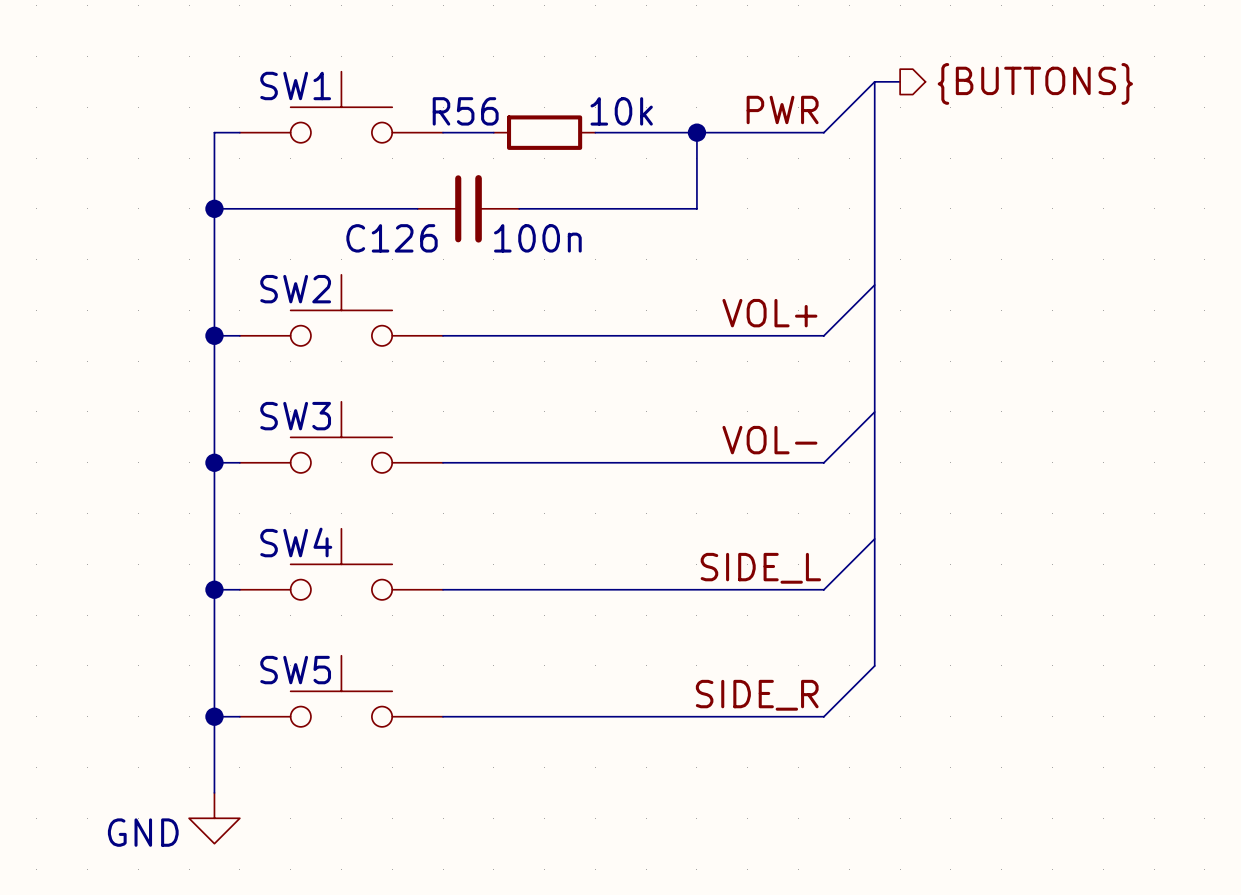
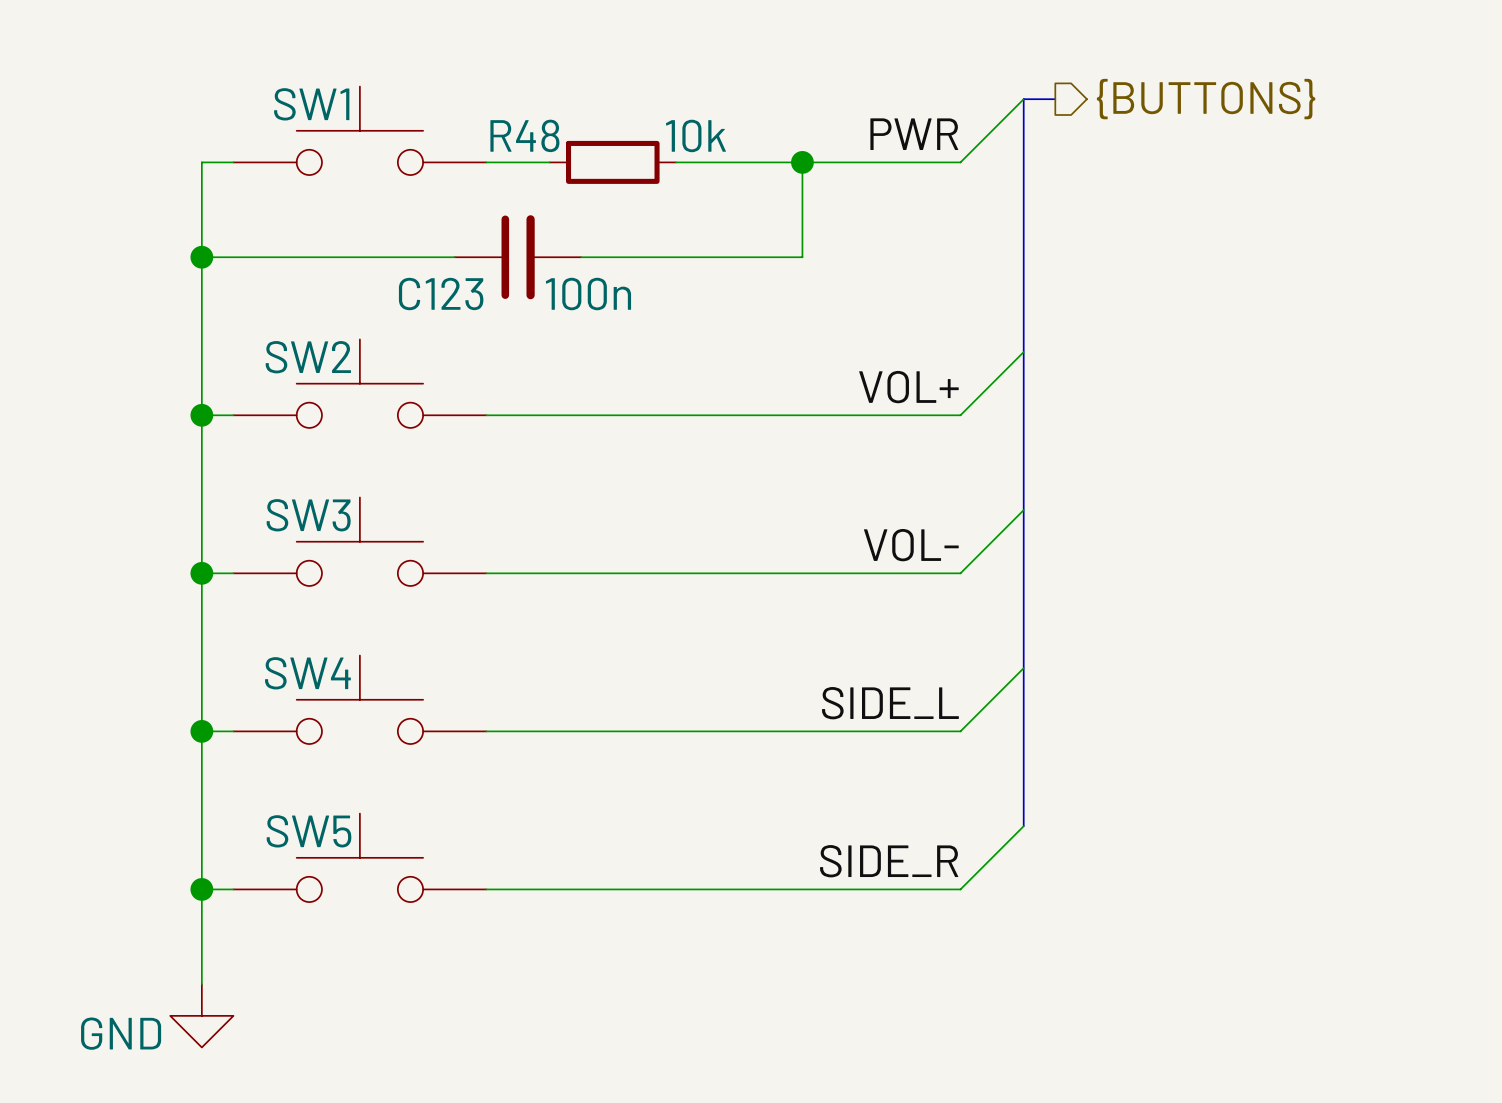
R56 name: R56 (465, 111) -> R48 (524, 135)
C126 name: C126 (392, 238) -> C123 (441, 294)

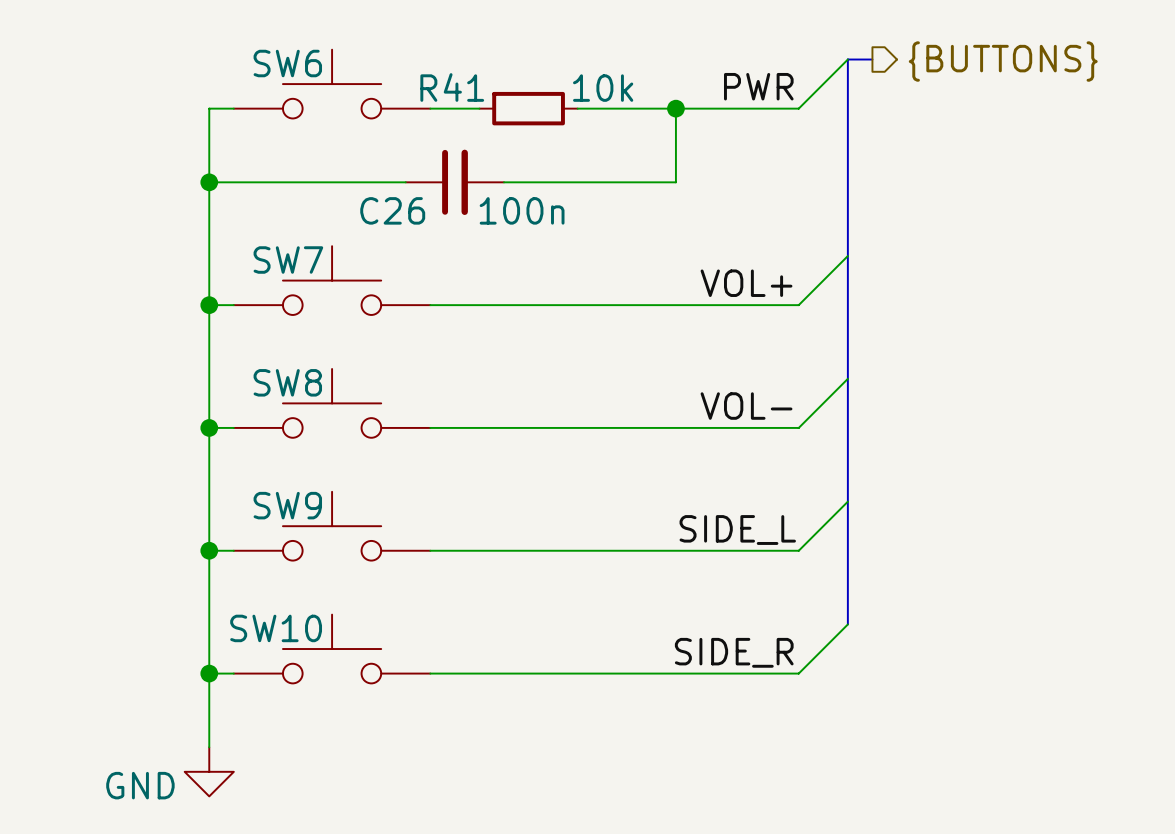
SW1 name: SW1 (311, 104) -> SW6 (287, 63)
R48 name: R48 (524, 135) -> R41 (452, 87)
C123 name: C123 (441, 294) -> C26 (392, 210)
SW2 name: SW2 (308, 357) -> SW7 (288, 260)
SW3 name: SW3 (308, 515) -> SW8 (287, 382)
SW4 name: SW4 (307, 673) -> SW9 (287, 505)
SW5 name: SW5 (309, 831) -> SW10 (276, 628)

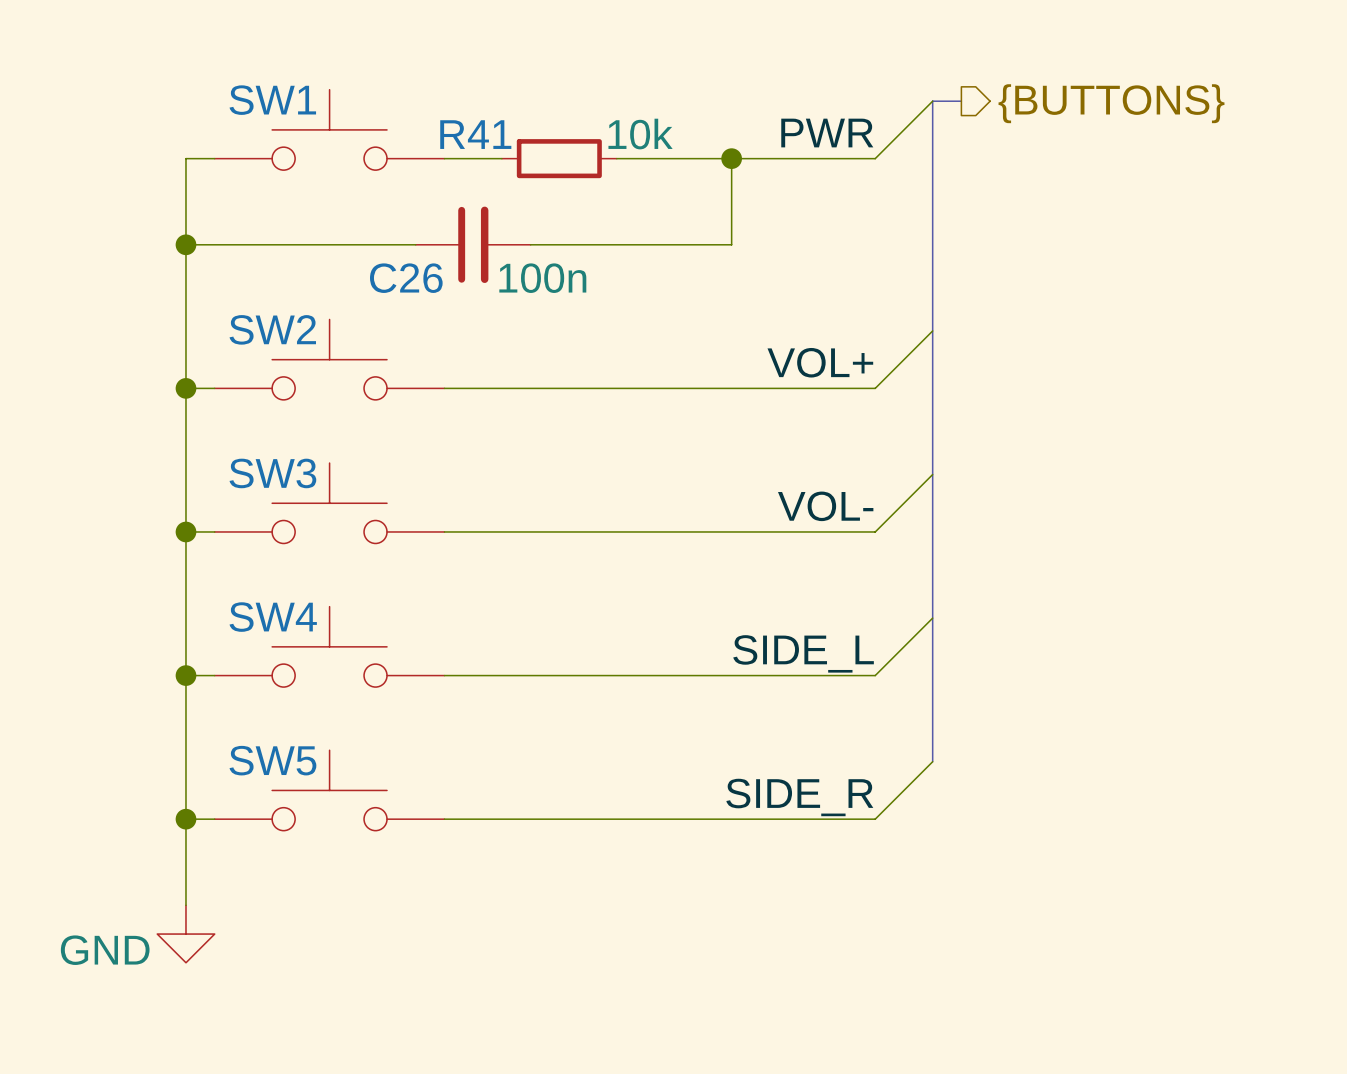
SW6 name: SW6 (287, 63) -> SW1 (272, 100)
SW7 name: SW7 (288, 260) -> SW2 (272, 329)
SW8 name: SW8 (287, 382) -> SW3 (272, 473)
SW9 name: SW9 (287, 505) -> SW4 (273, 617)
SW10 name: SW10 (276, 628) -> SW5 (272, 760)

